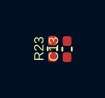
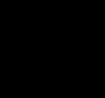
R23: (52, 48) -> none
C13: (67, 49) -> none

